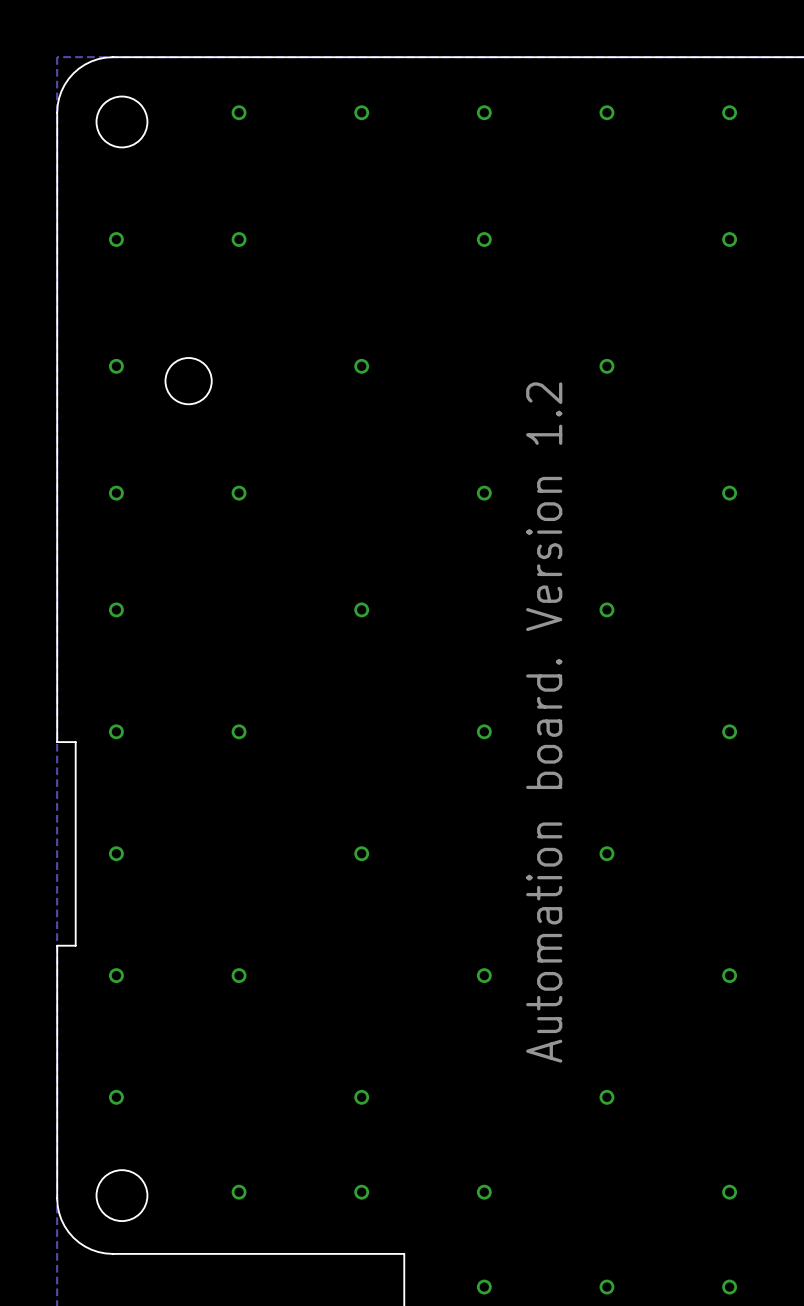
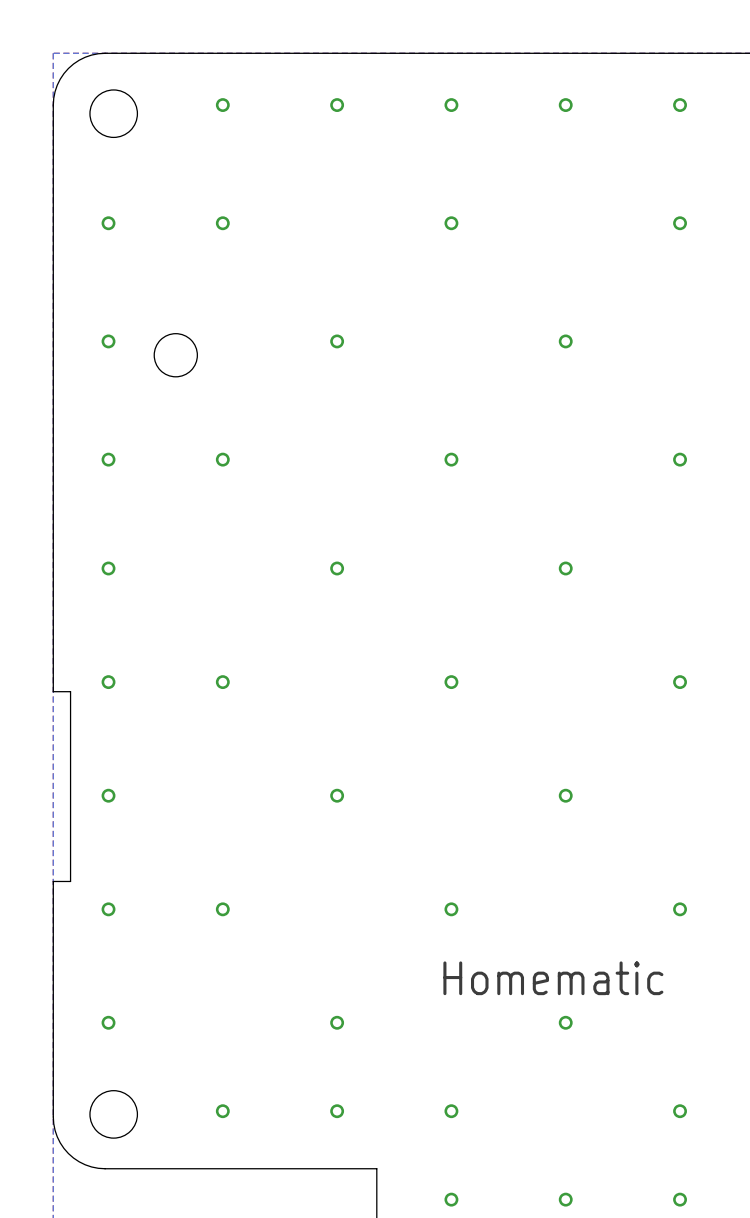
text: Automation board. Version 1.2 (544, 722) -> none
text: none -> Homematic (553, 978)

